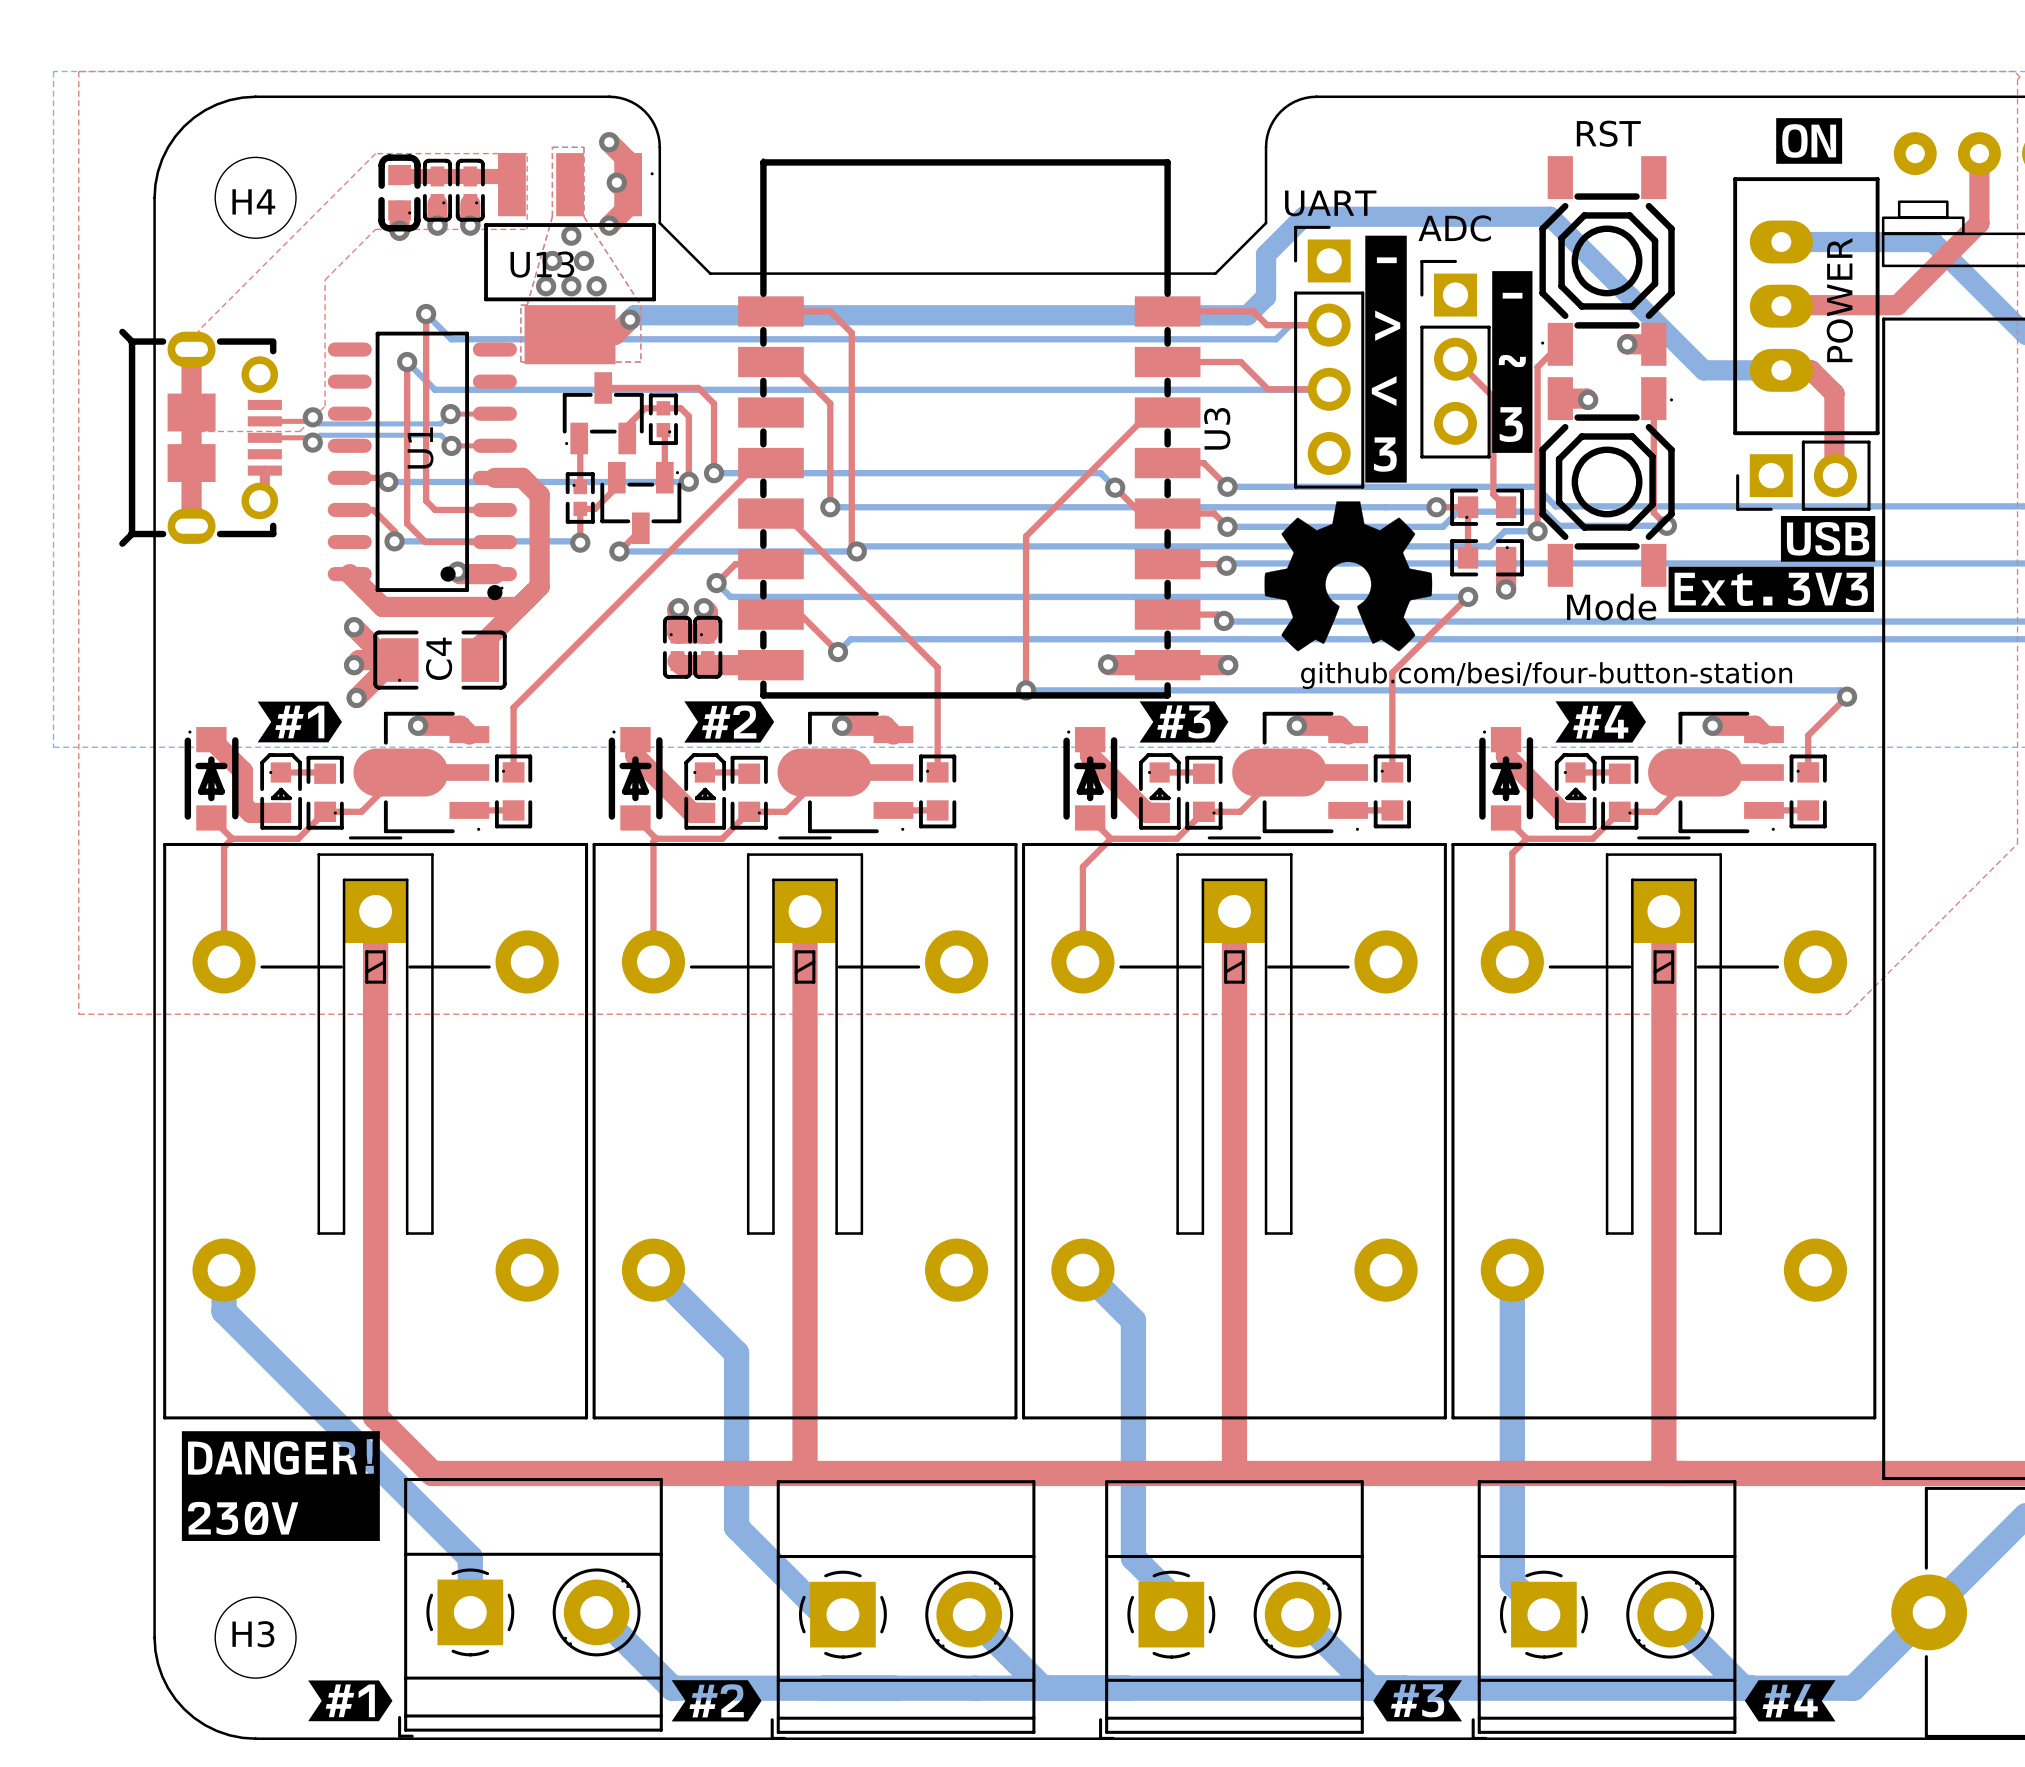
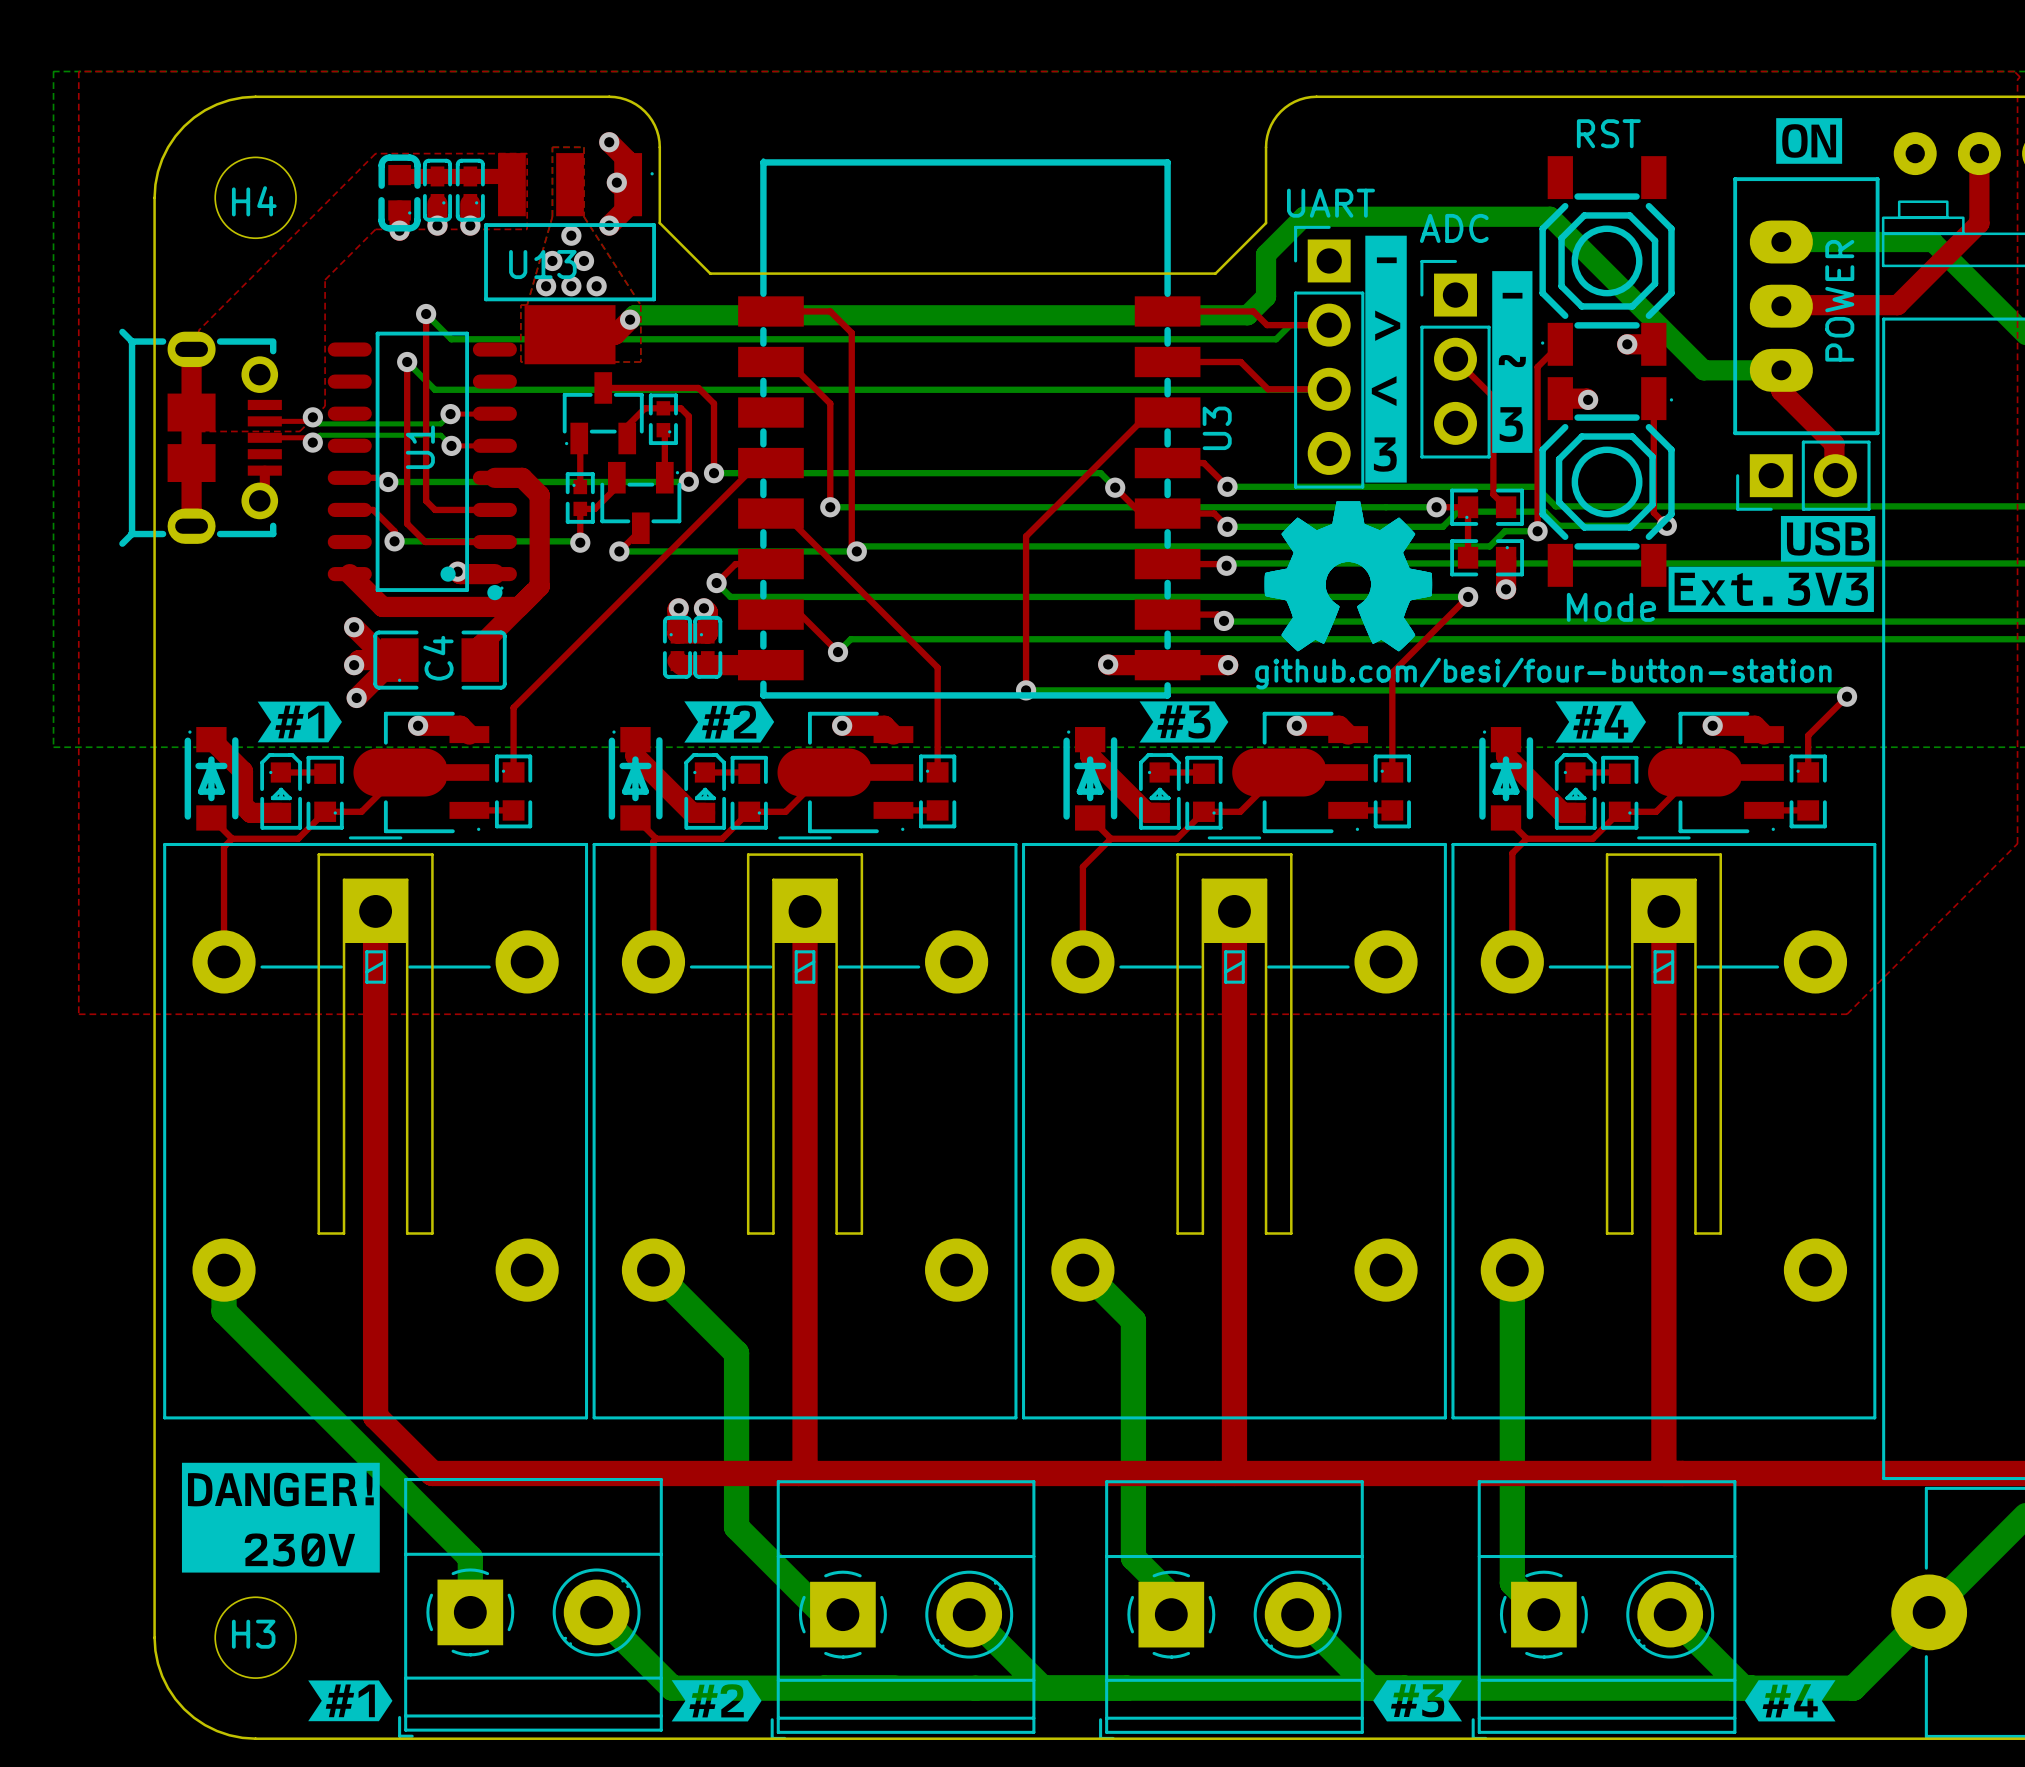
top track: (1781, 370) (1811, 370) (1834, 393) (1834, 444) -> (1781, 370) (1781, 391) (1834, 444)
drawing: [1264, 501, 1433, 652] -> none
drawing: none -> [1264, 501, 1433, 652]
drawing: [181, 1431, 380, 1542] -> none
drawing: none -> [181, 1462, 380, 1573]

